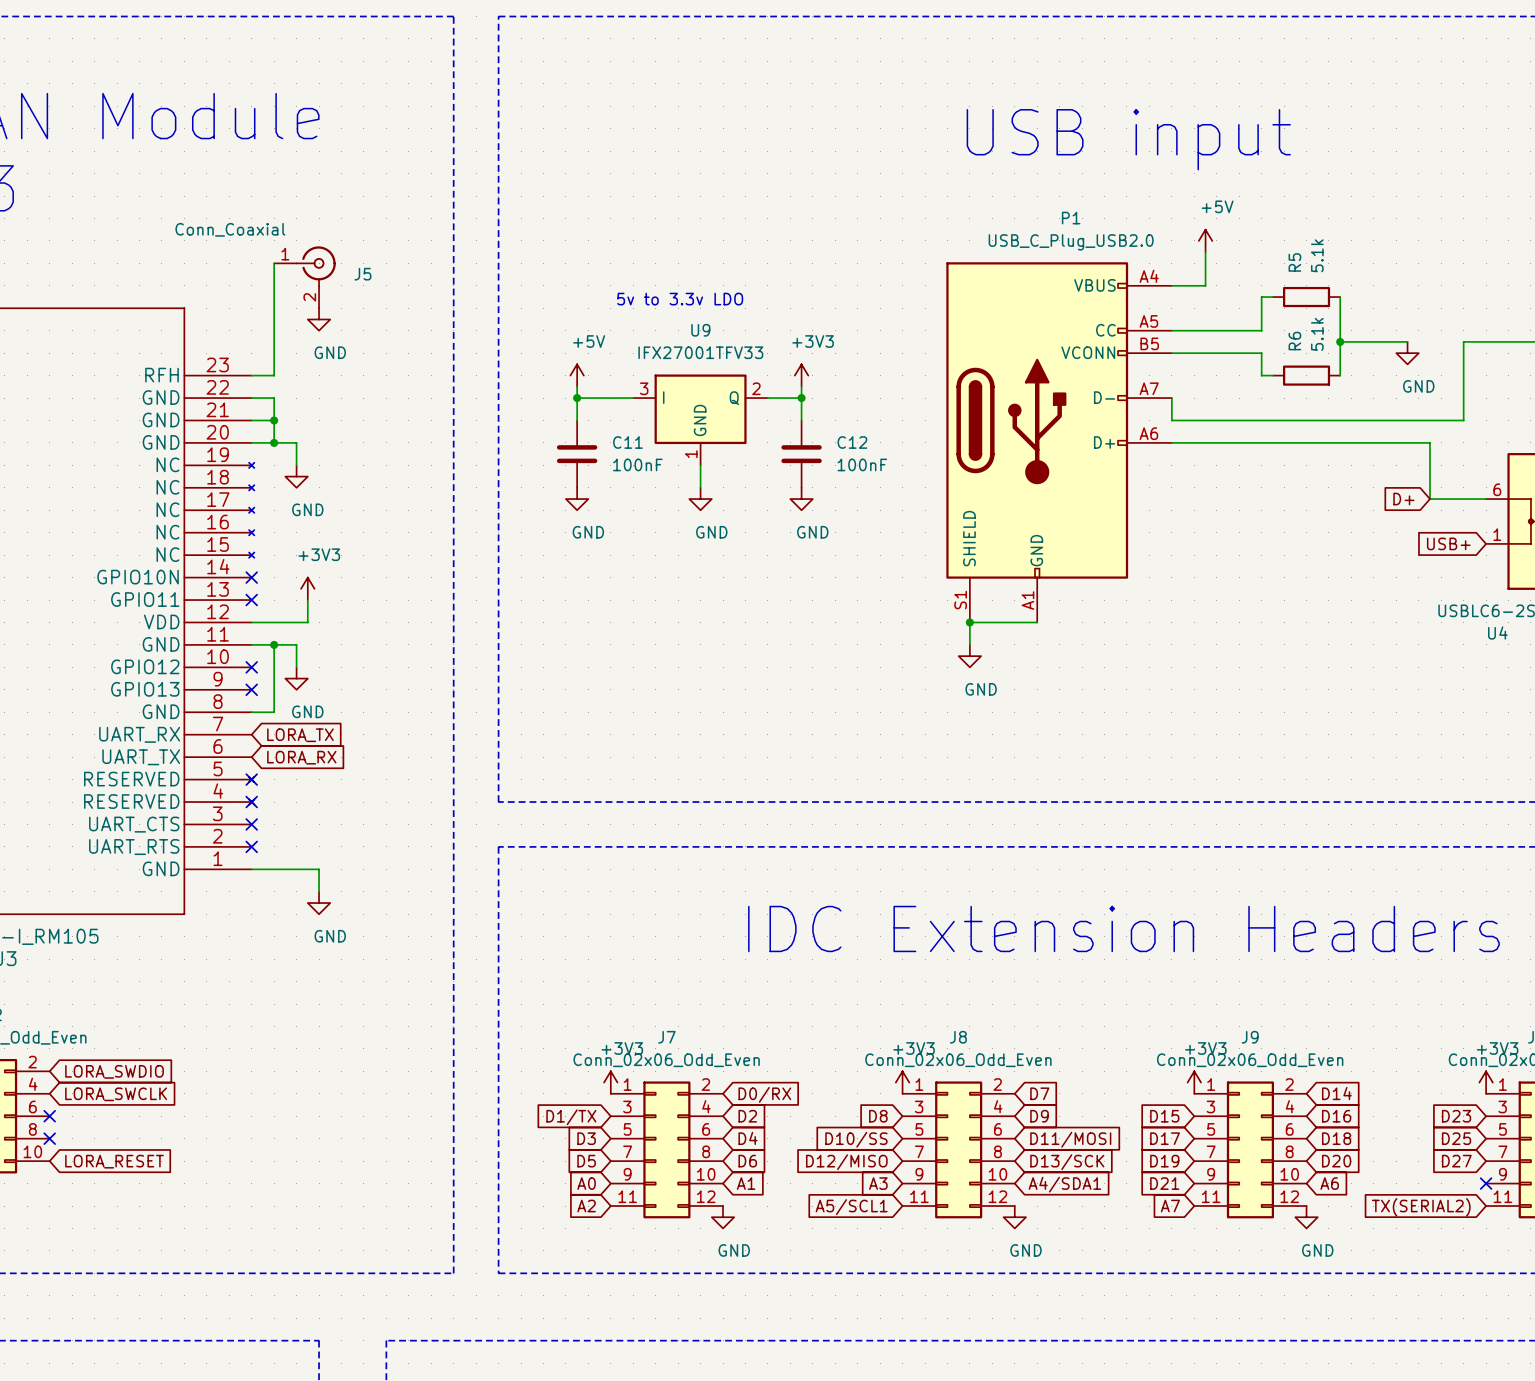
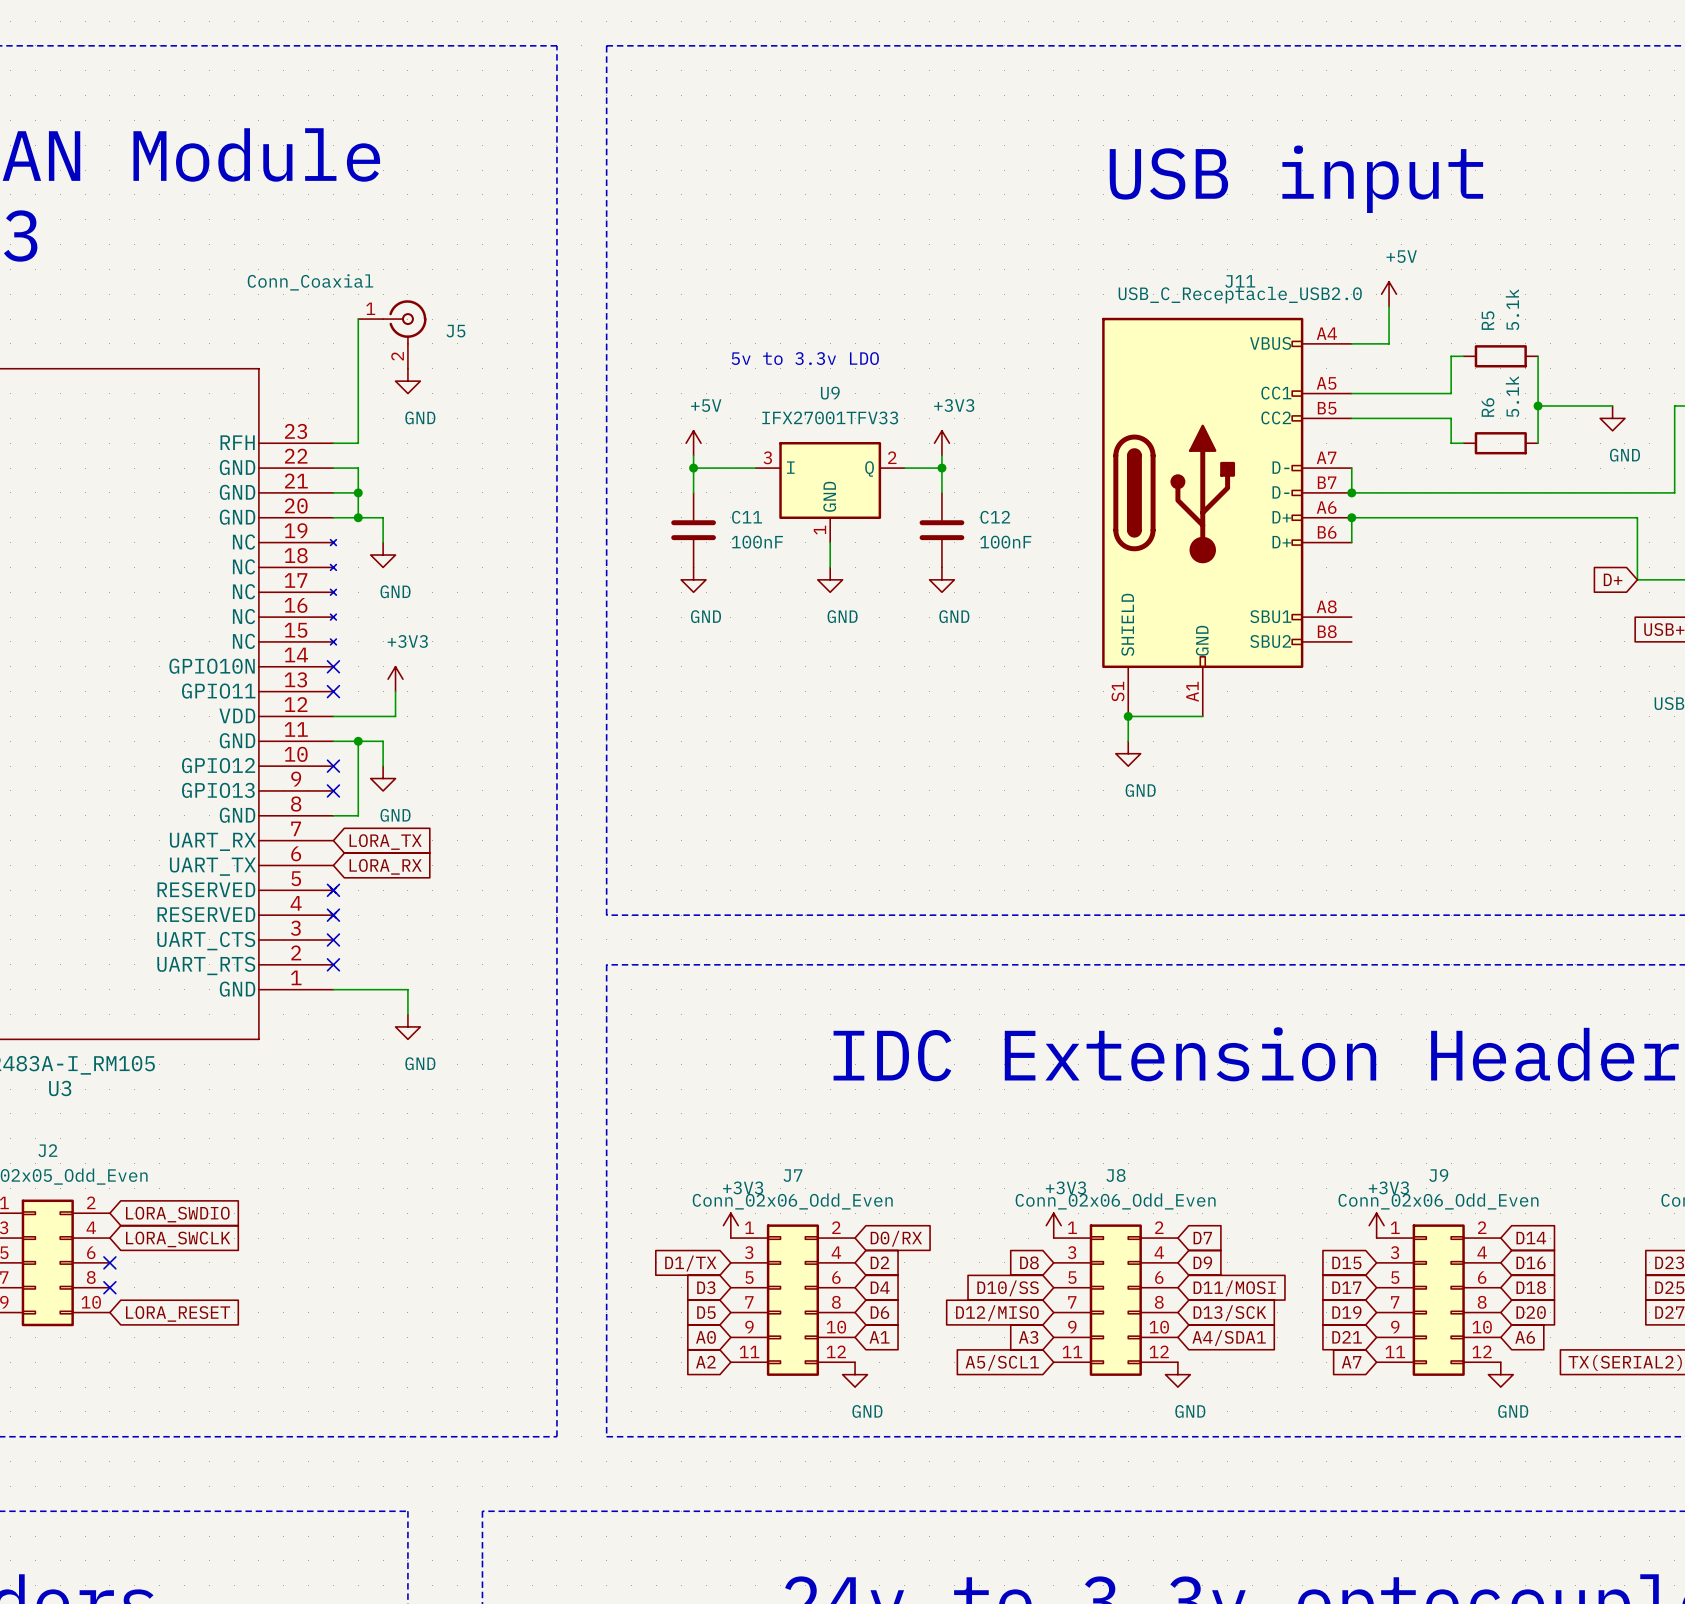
junction: none -> (1351, 492)
P1: USB_C_Plug_USB2.0 (1059, 442) -> none
J11: none -> USB_C_Receptacle_USB2.0 (1226, 517)
wire: none -> (1351, 517) (1351, 542)
junction: none -> (1351, 517)

